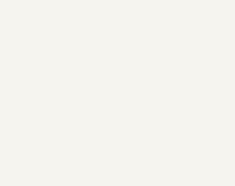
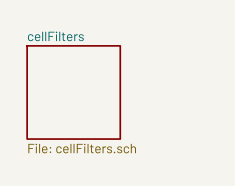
sheet cellFilters: none -> File: cellFilters.sch (73, 92)

